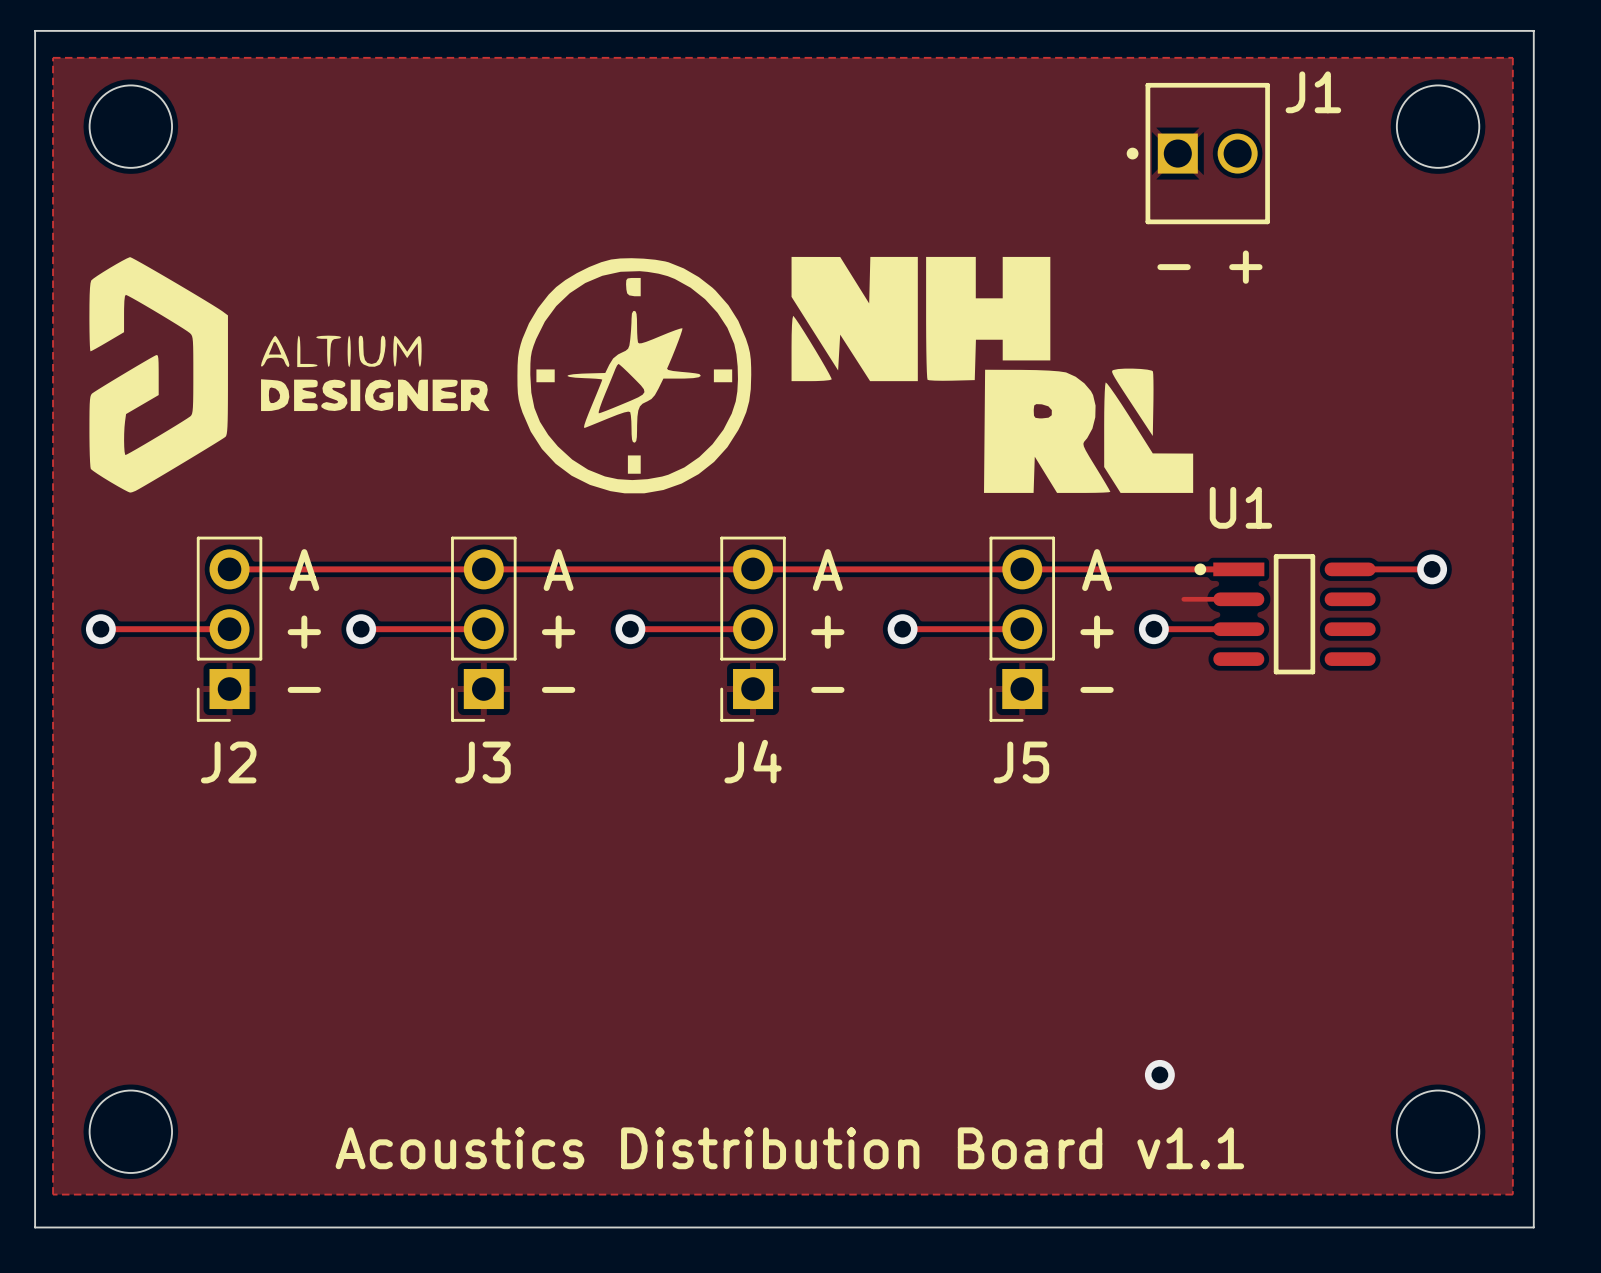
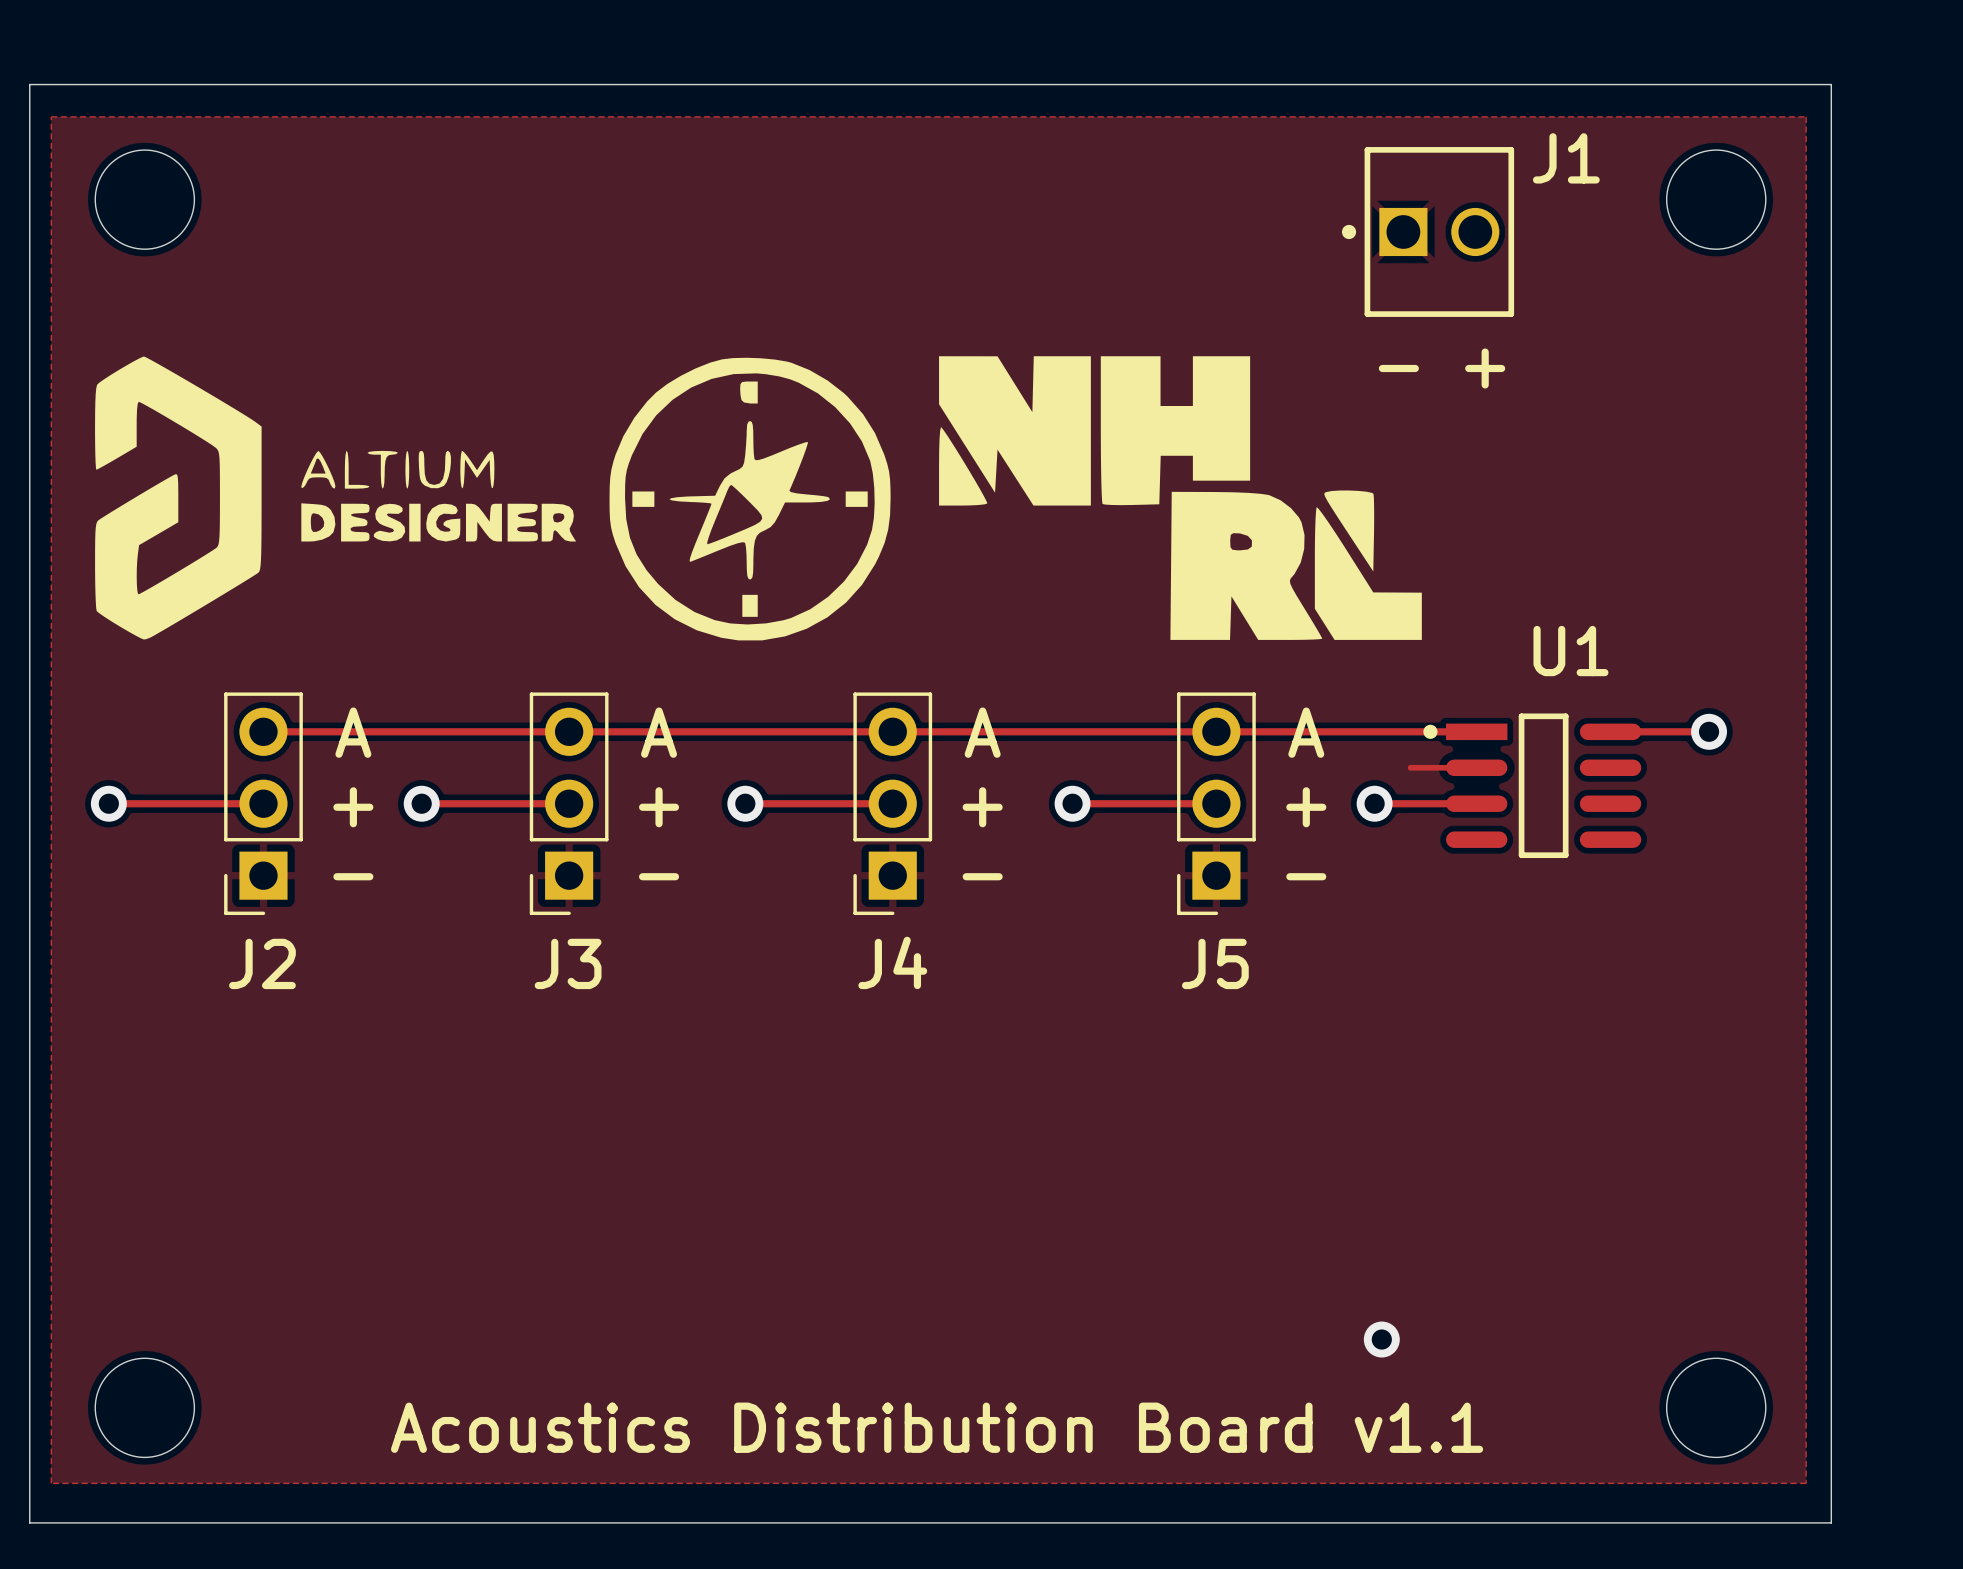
U1 name position: U1 (1240, 507) -> U1 (1570, 651)

